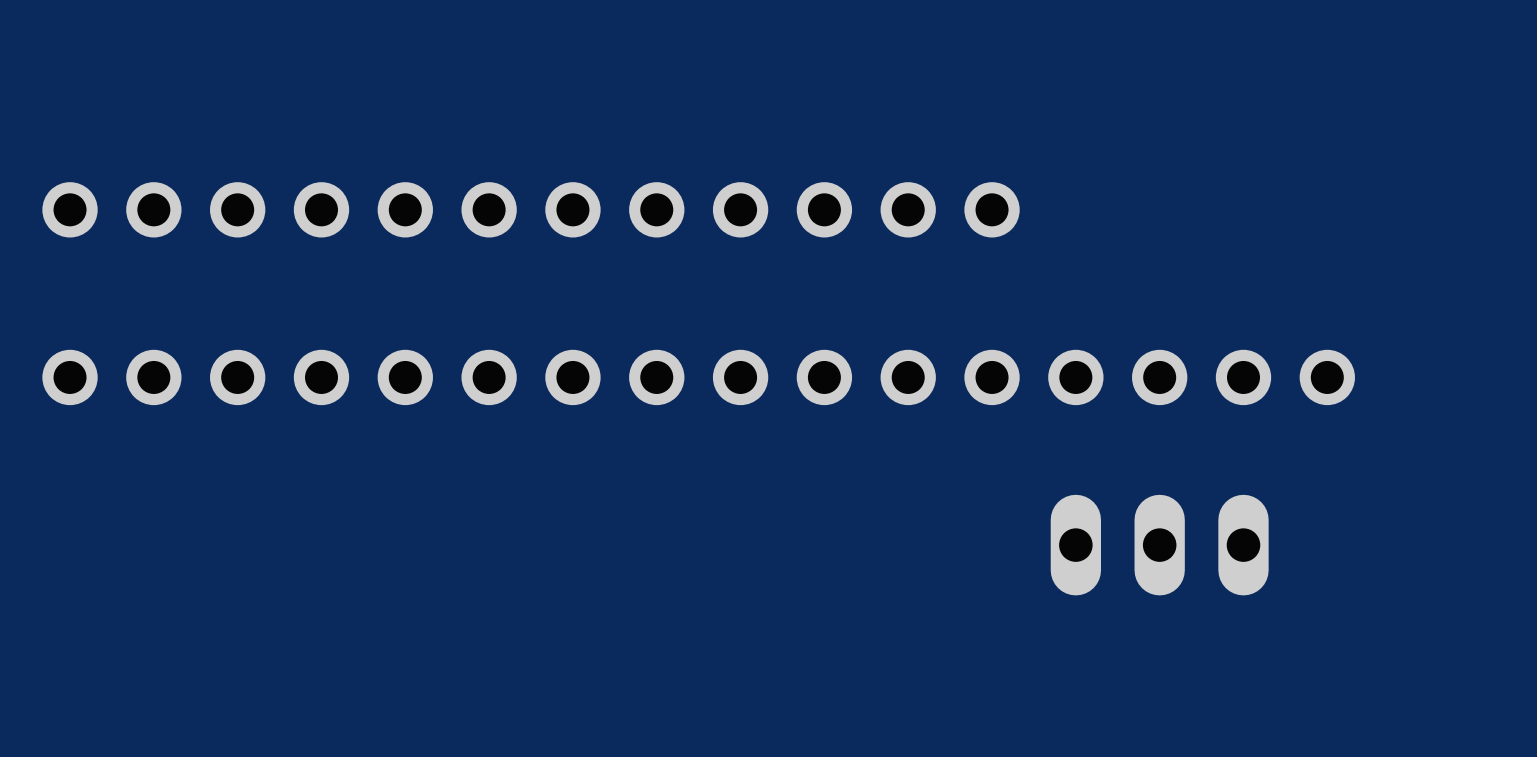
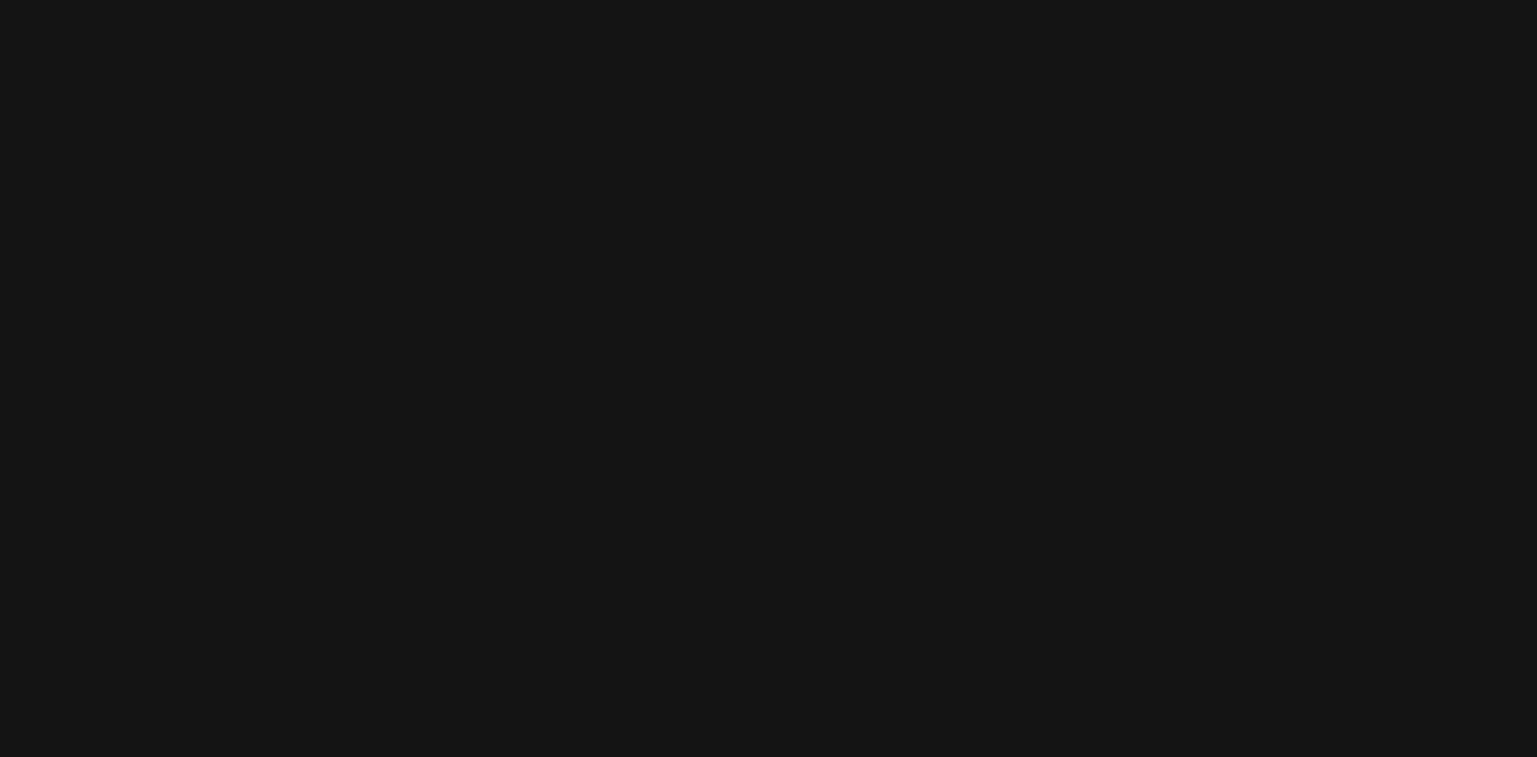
part: (531, 209) -> none
part: (698, 377) -> none
part: (1159, 545) -> none

